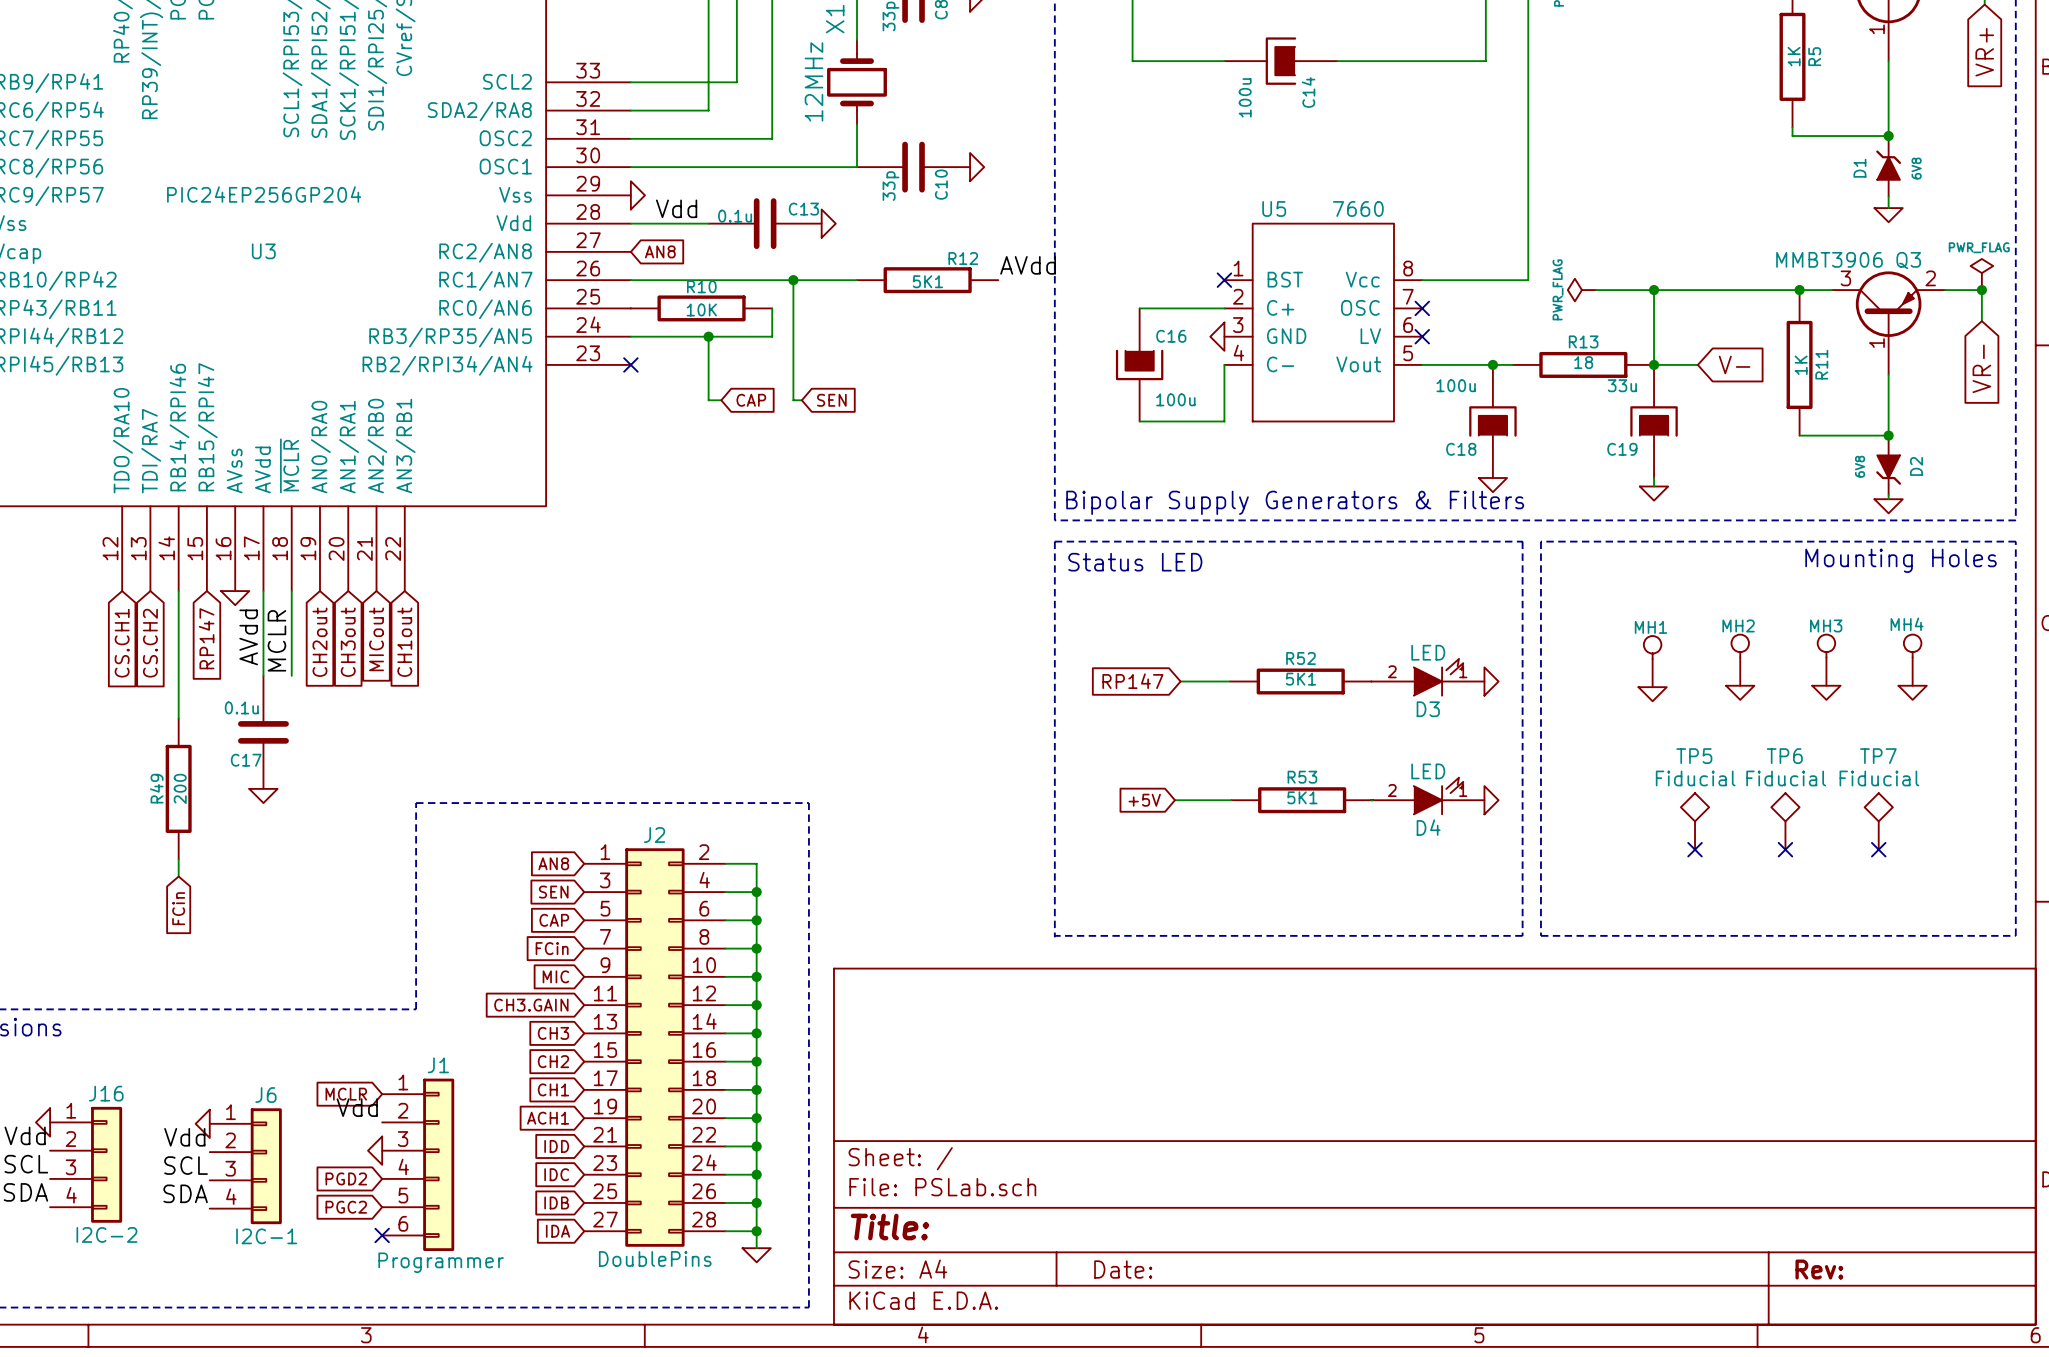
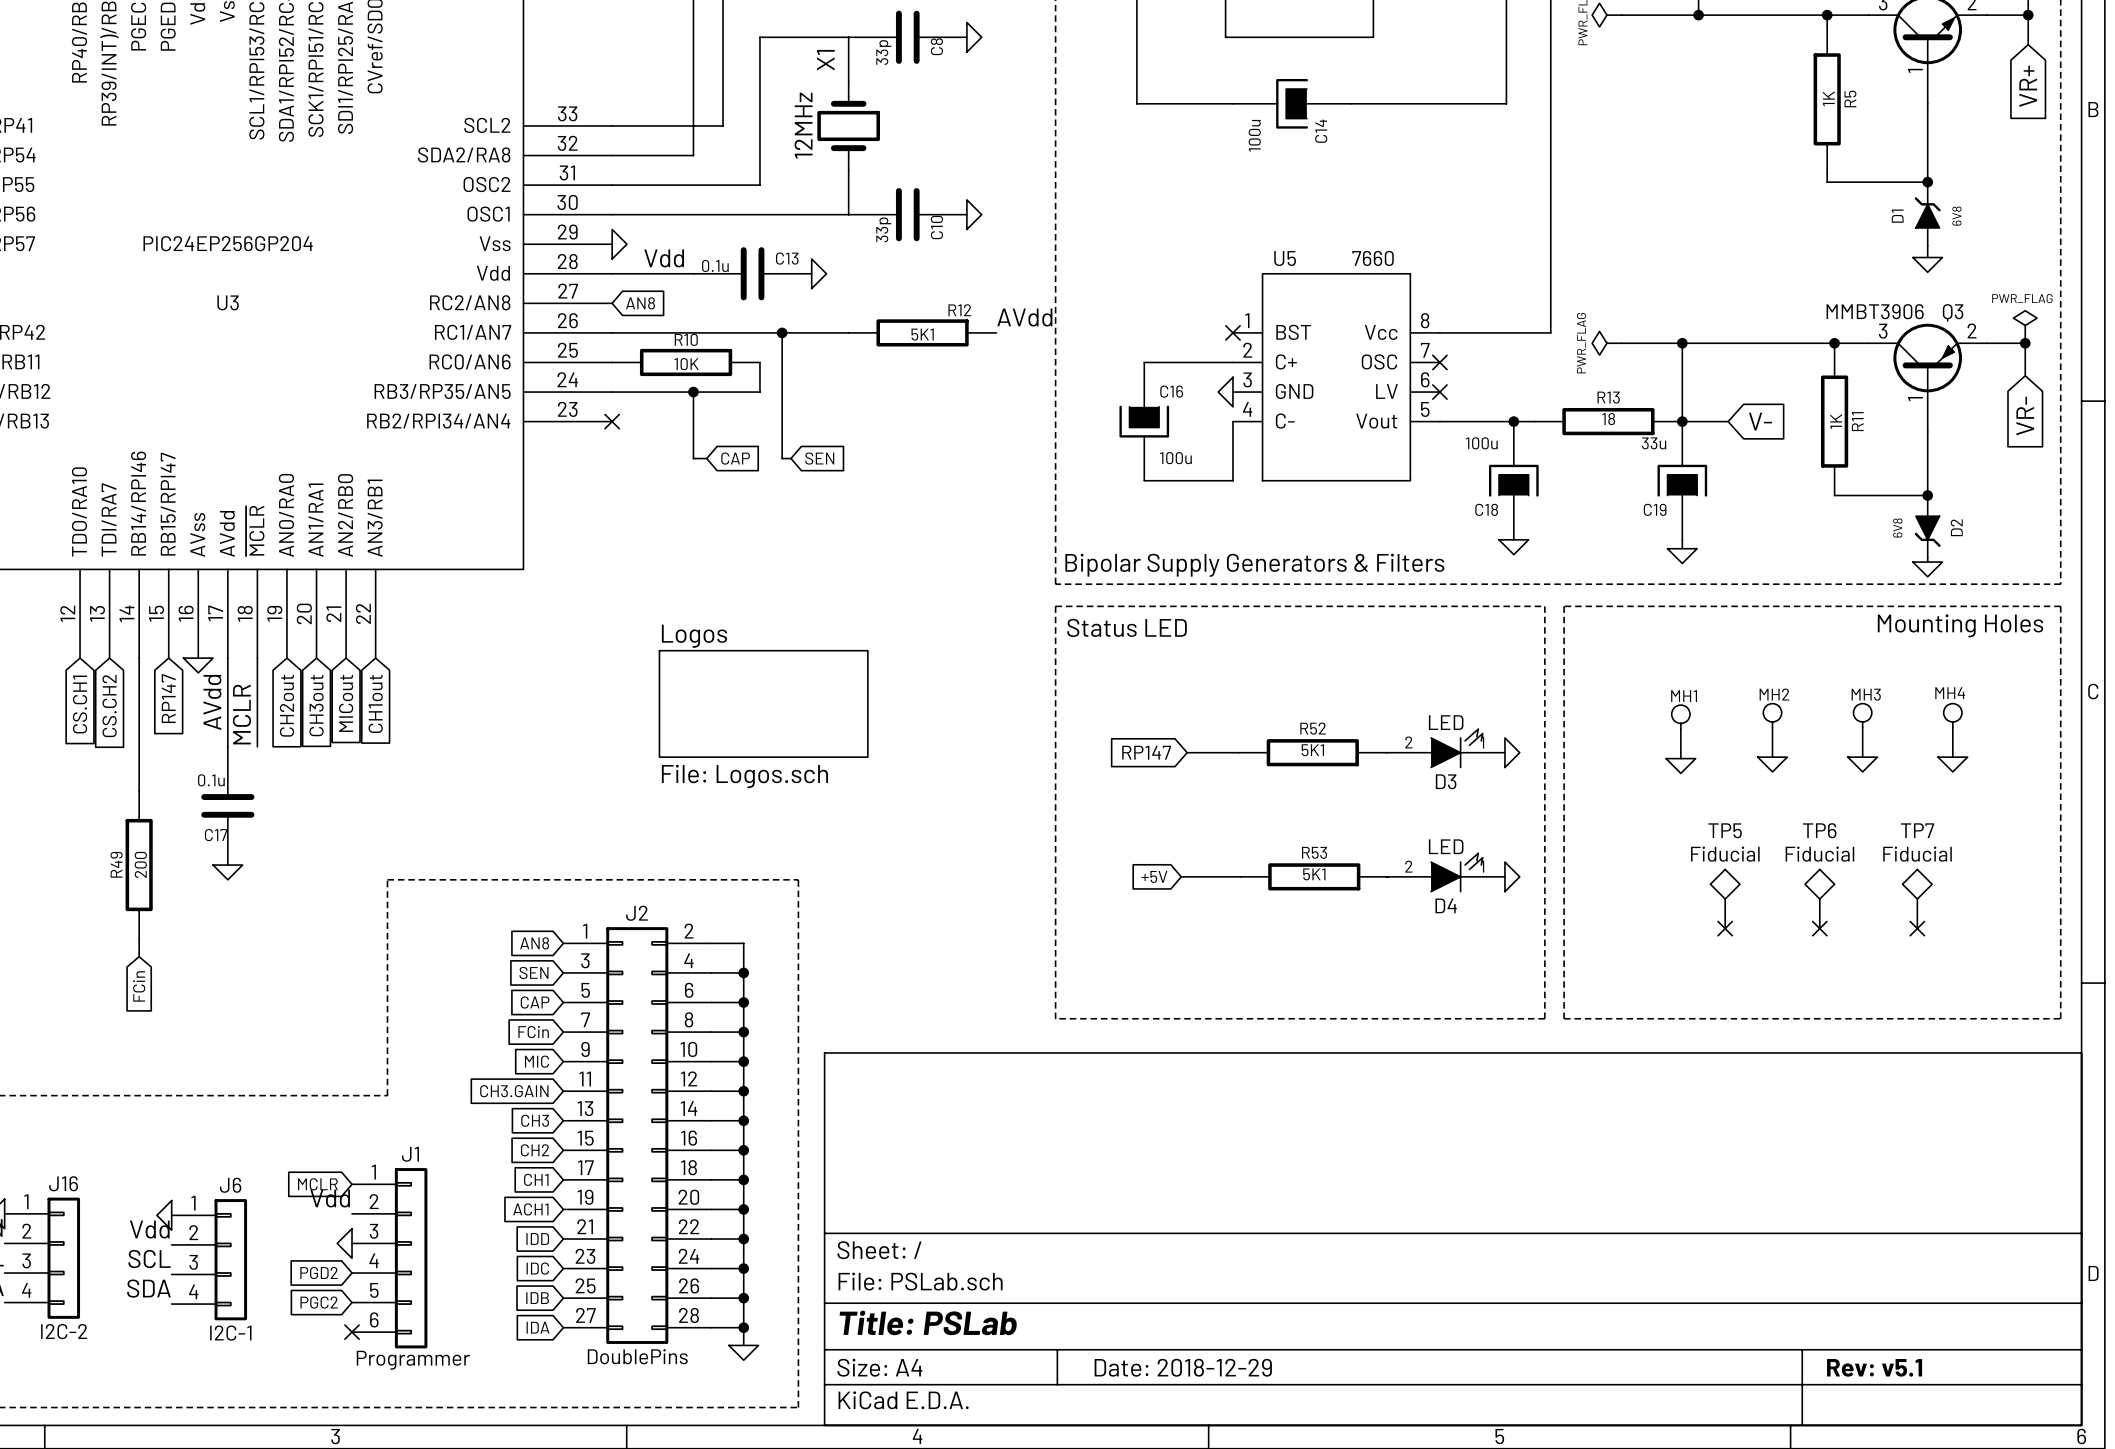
sheet Logos: none -> File: Logos.sch (763, 703)
title block: Title: (889, 1227) -> Title: PSLab (928, 1322)
title block: Date: (1123, 1269) -> Date: 2018-12-29 (1183, 1367)
title block: Rev: (1819, 1269) -> Rev: v5.1 (1874, 1367)

